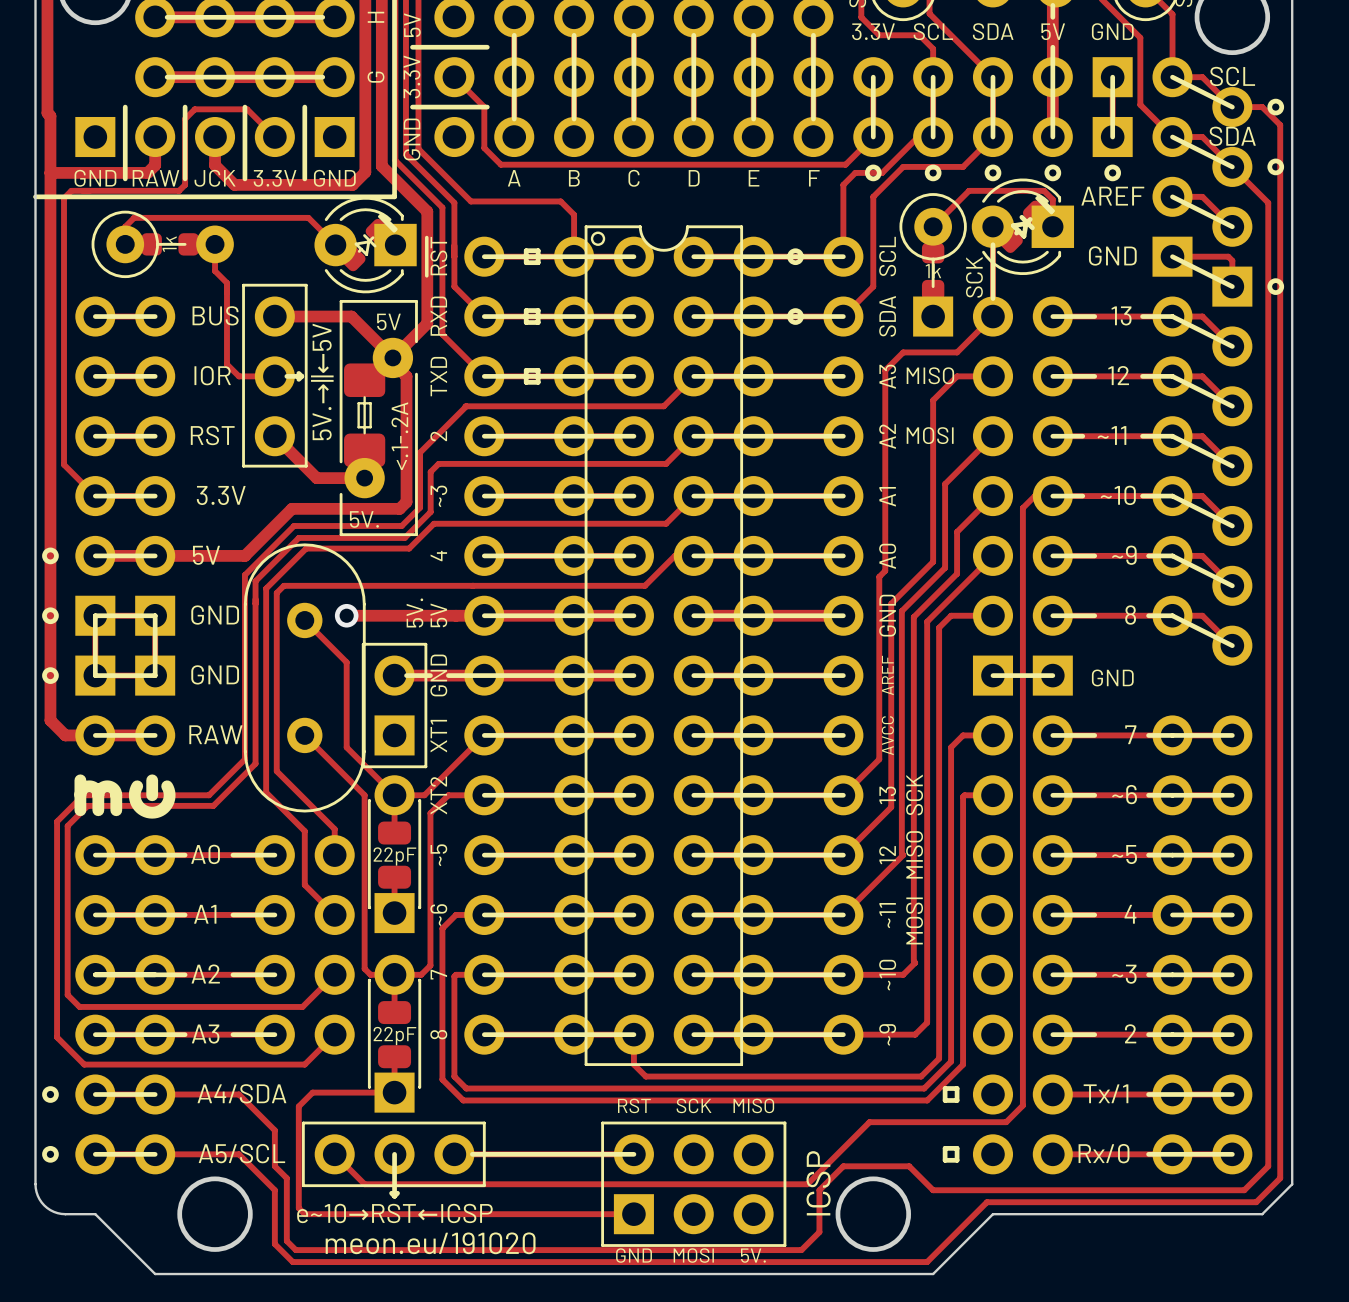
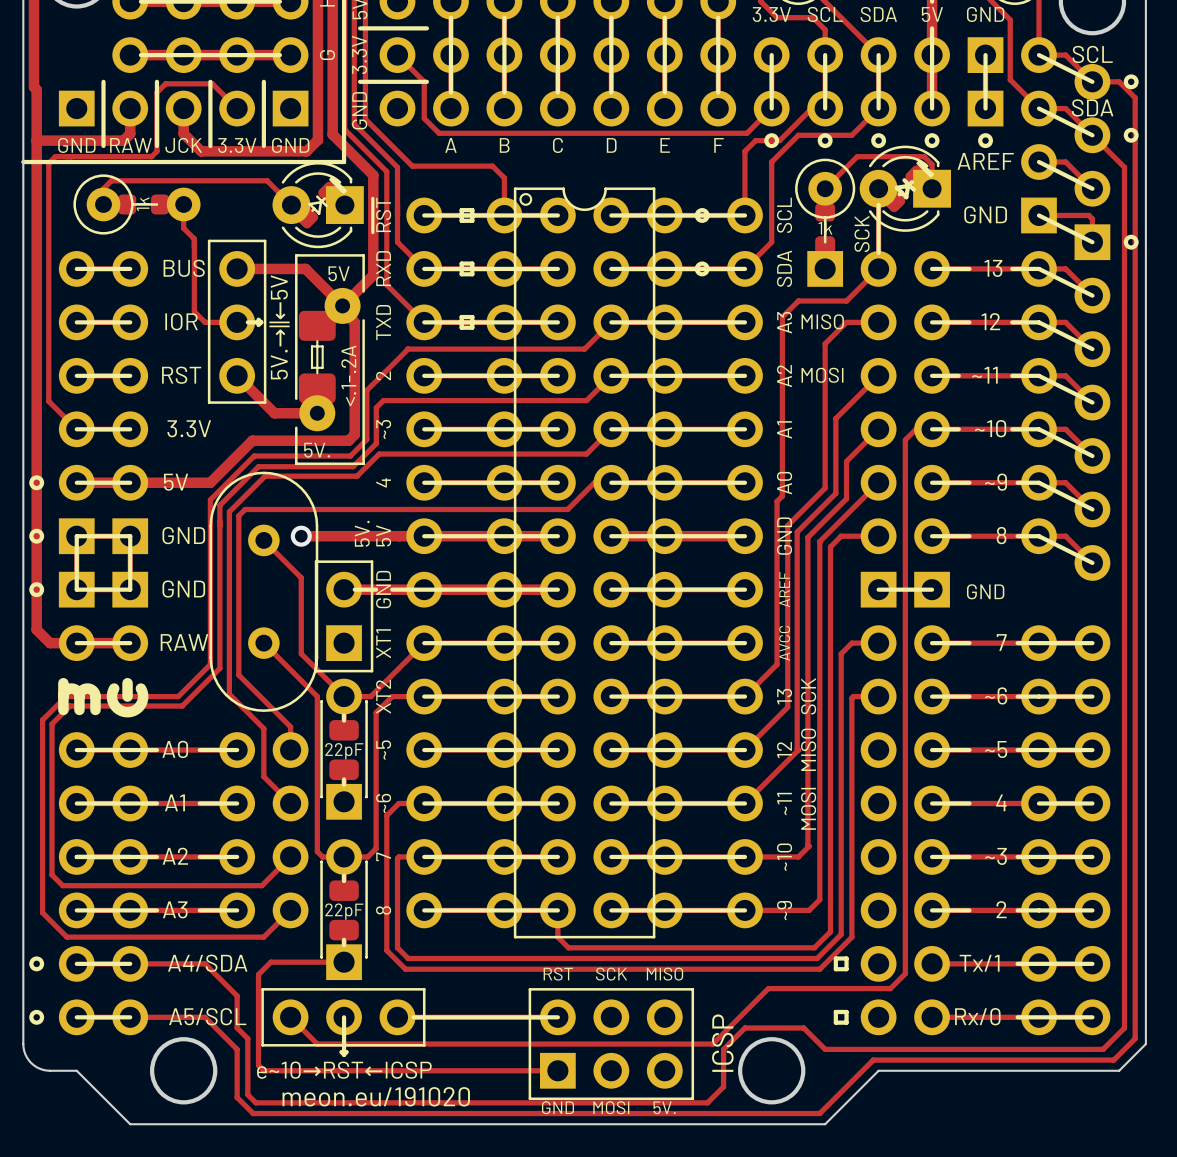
line: none -> (344, 715) (344, 720)
line: none -> (344, 779) (344, 784)
line: none -> (344, 875) (344, 881)
line: none -> (344, 939) (344, 945)

